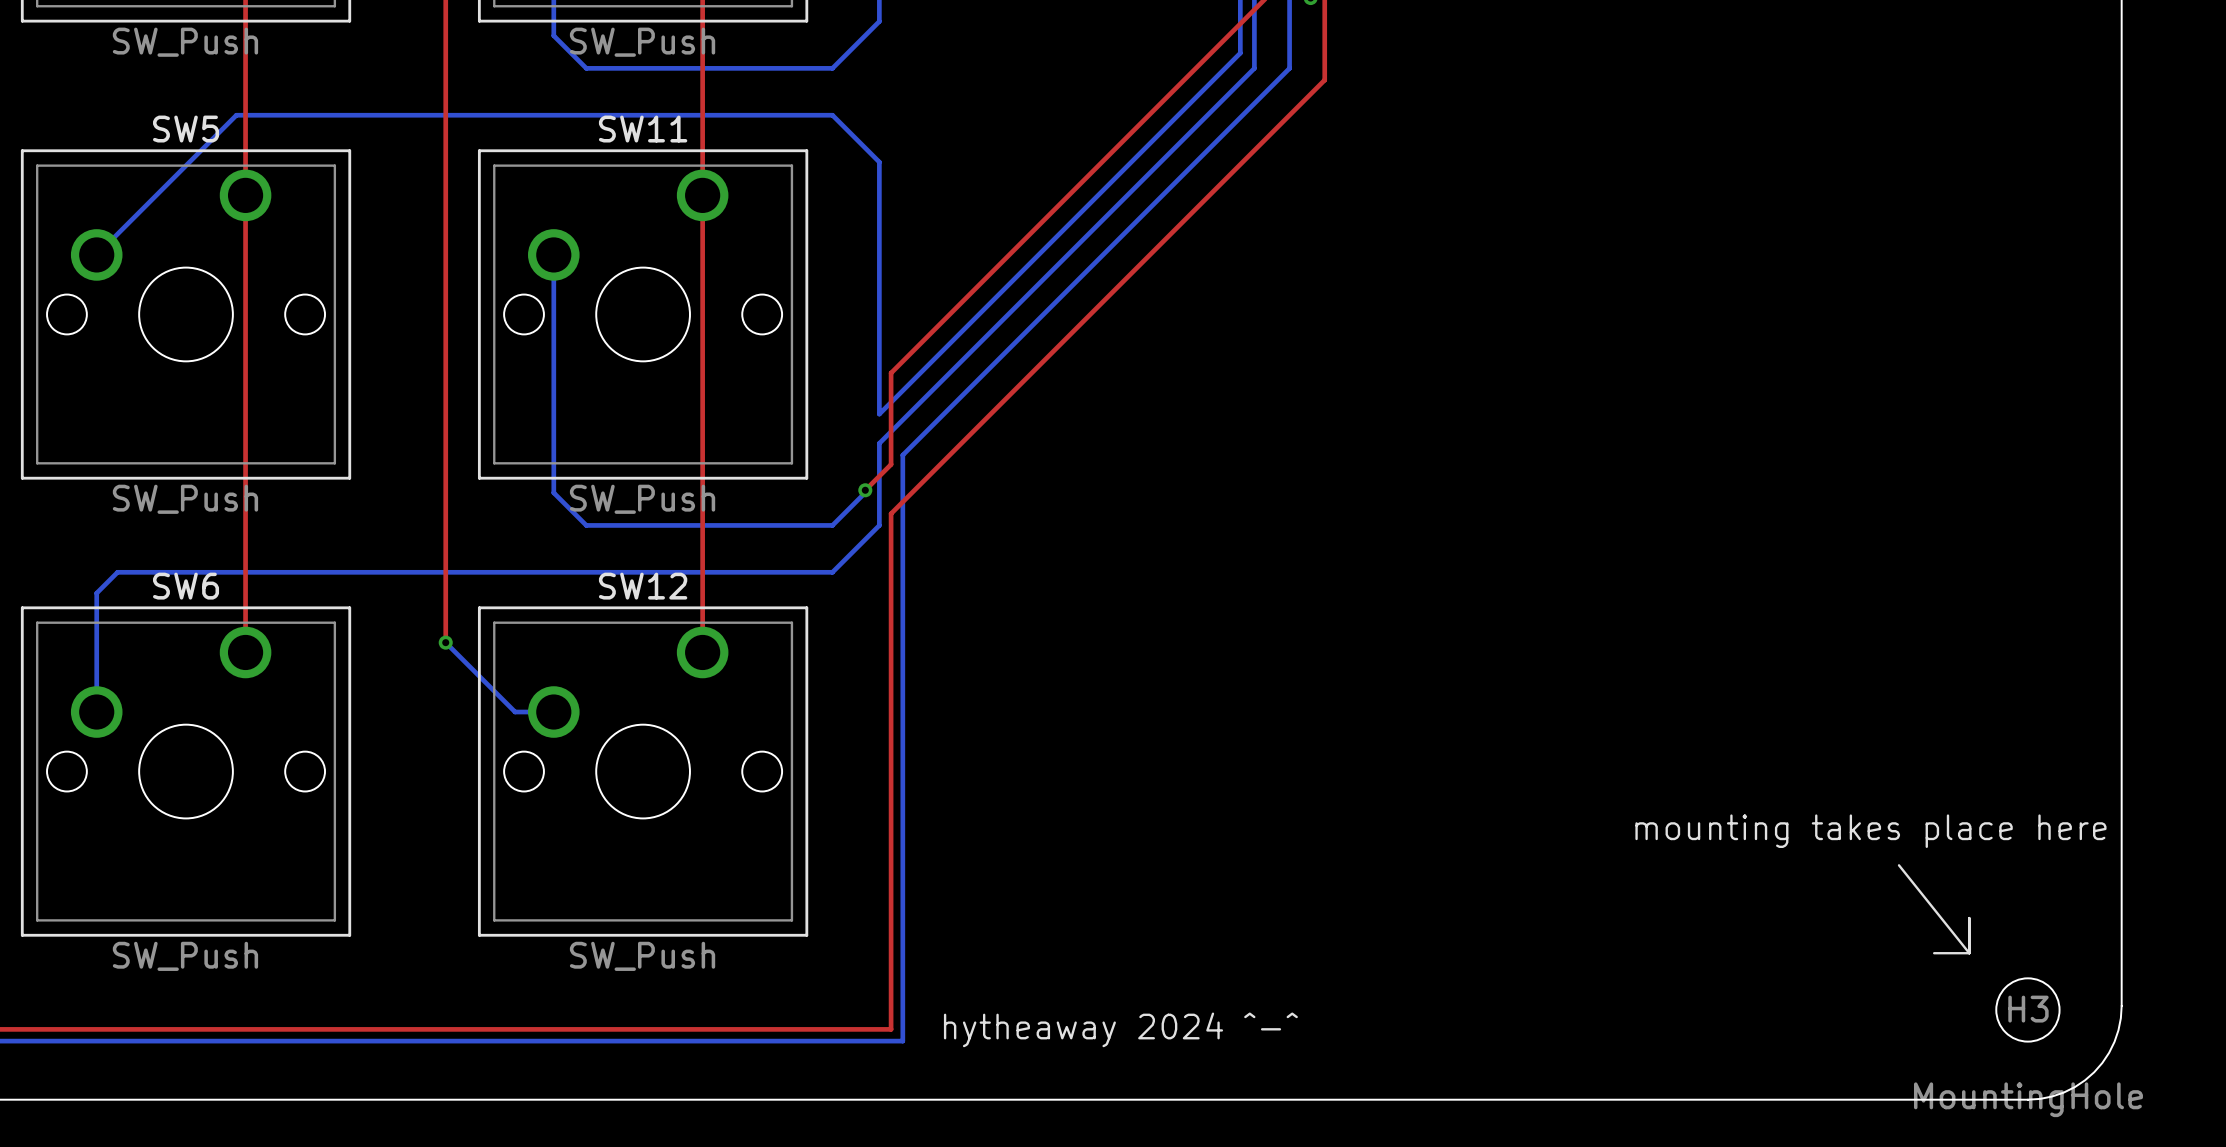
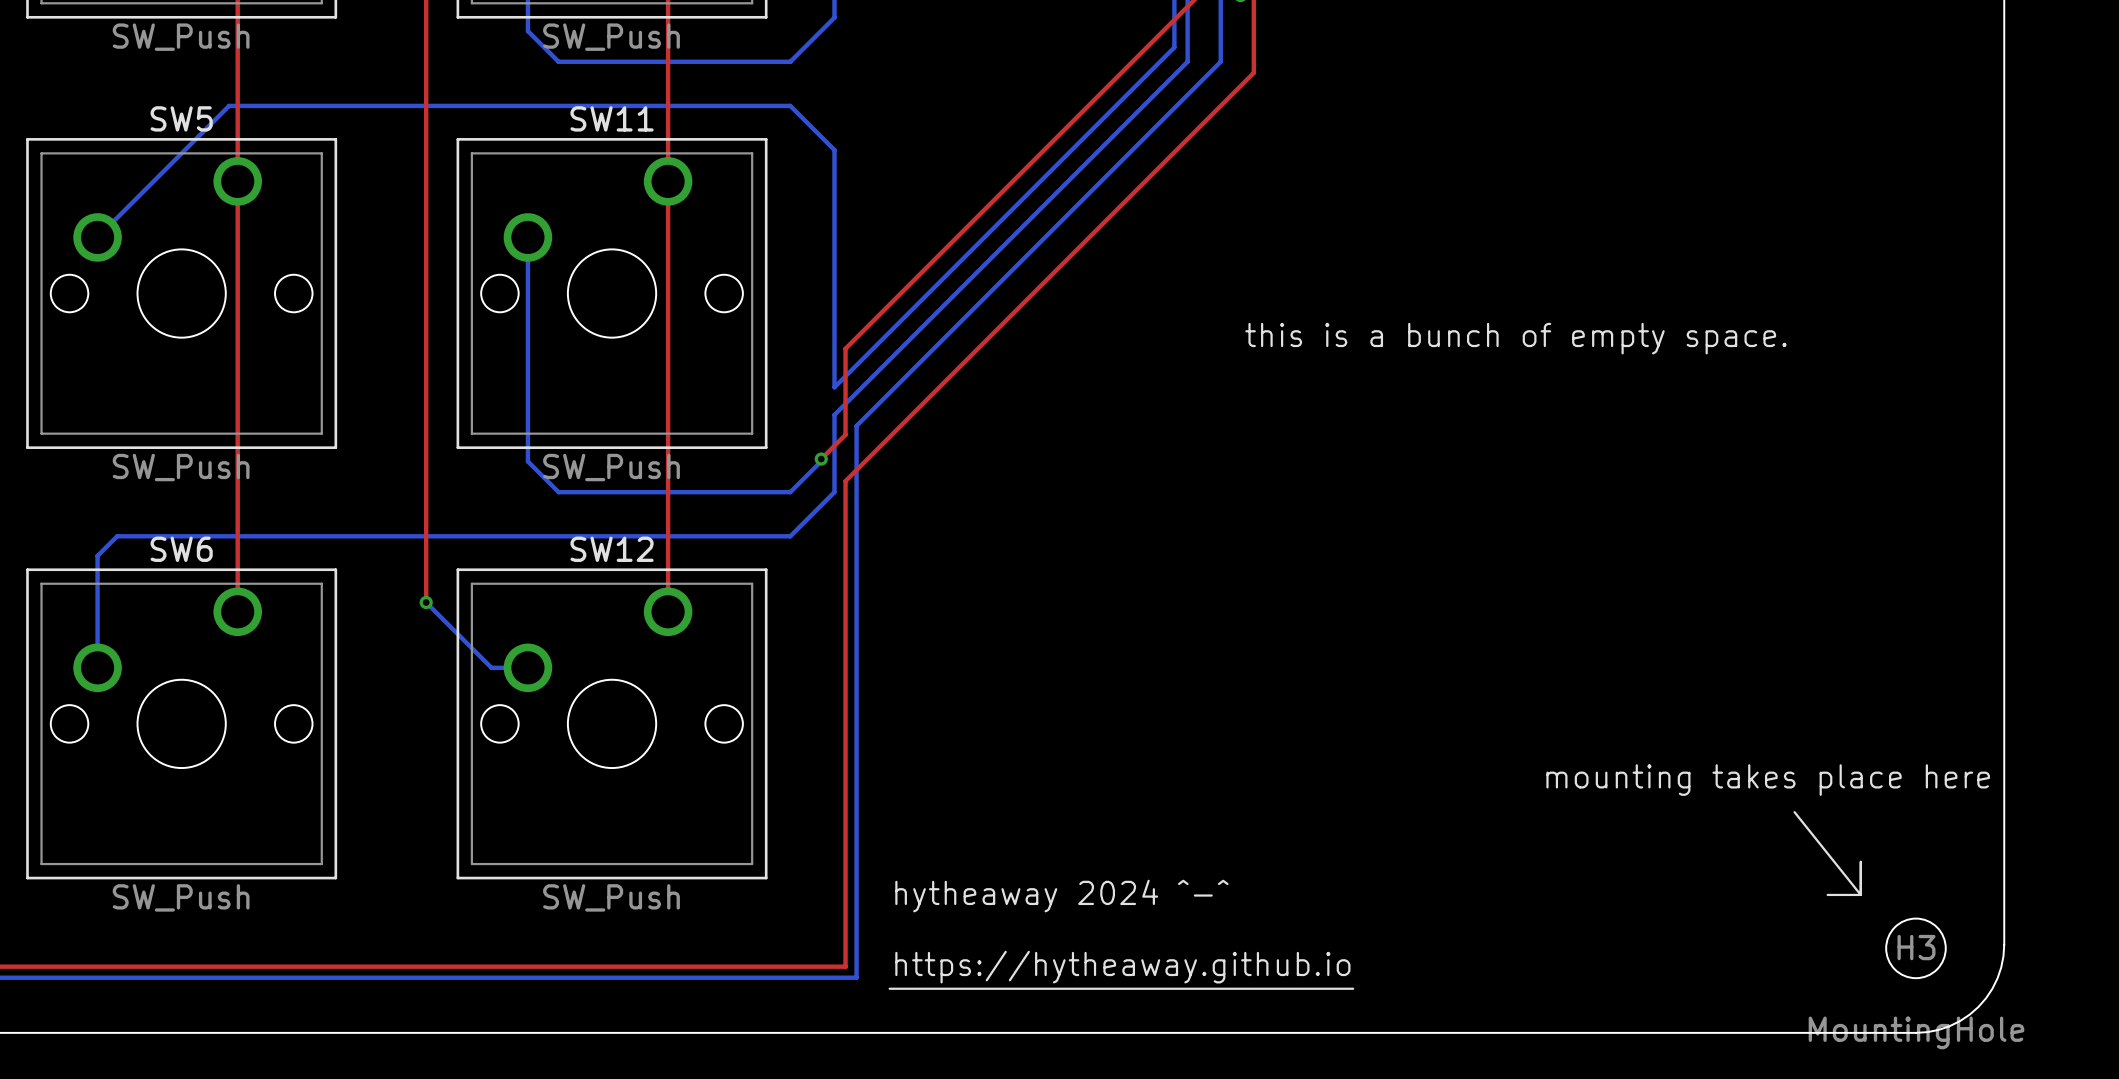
text: none -> this is a bunch of empty space. (1515, 338)
text: none -> hytheaway 2024 ^-^ (1061, 896)
text: hytheaway 2024 ^-^ (1120, 1029) -> https://hytheaway.github.io (1122, 967)
line: none -> (889, 988) (1353, 988)

